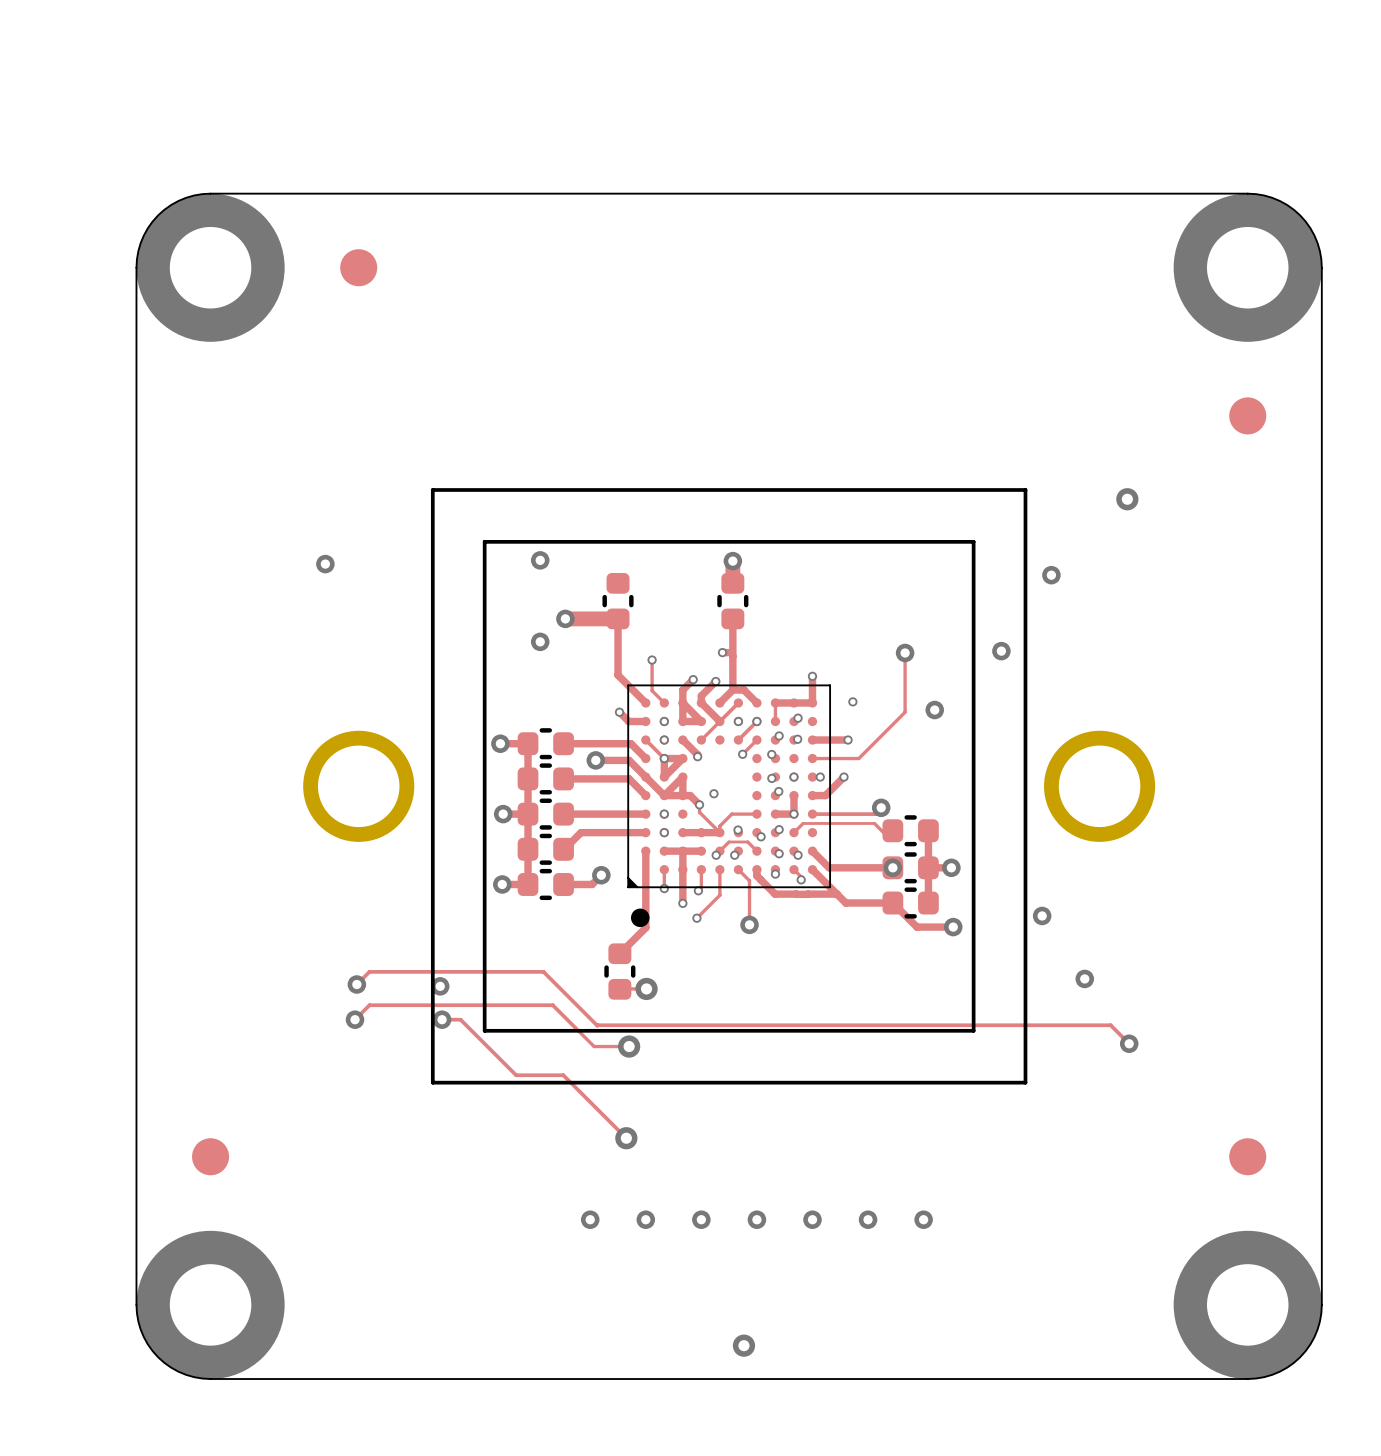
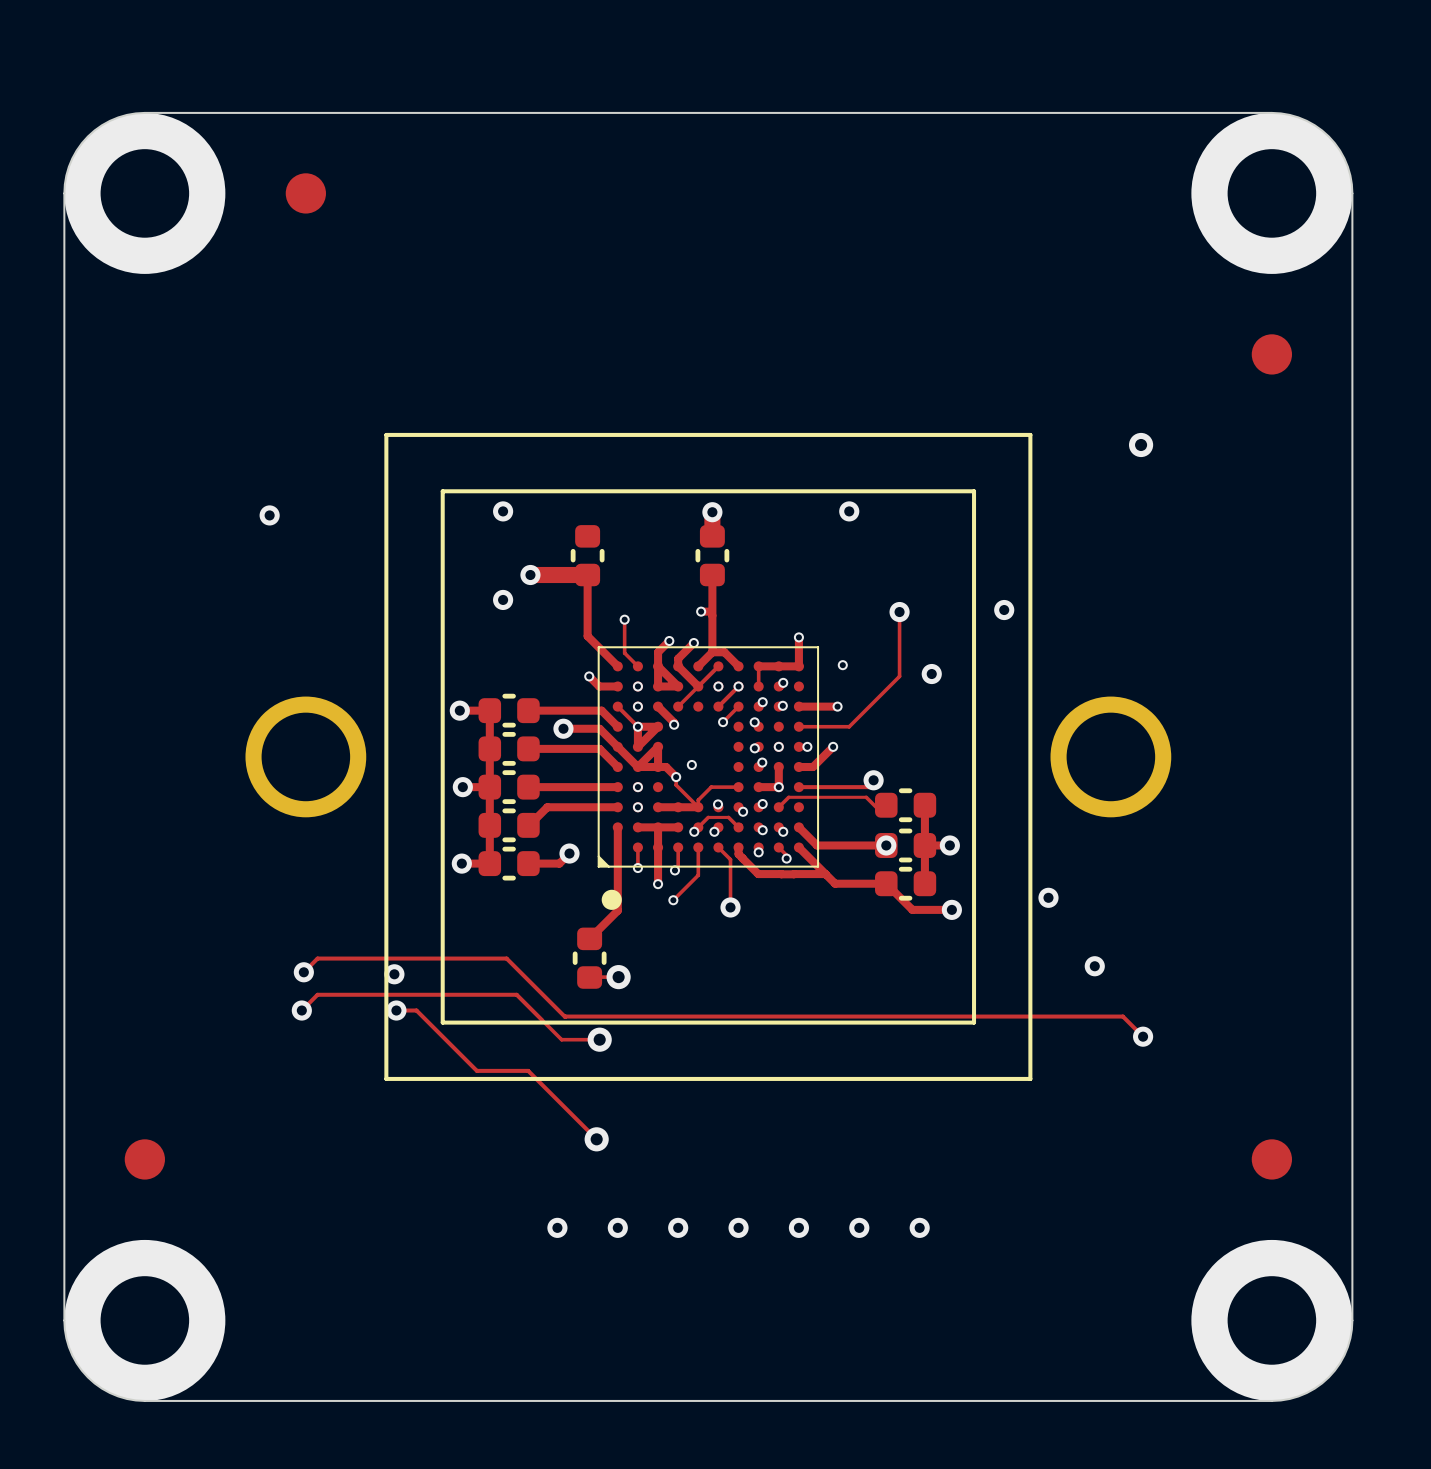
via position: (1051, 575) -> (849, 511)
via: (743, 1345) -> none

